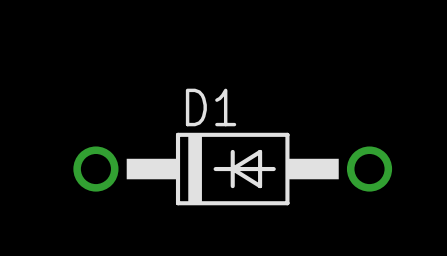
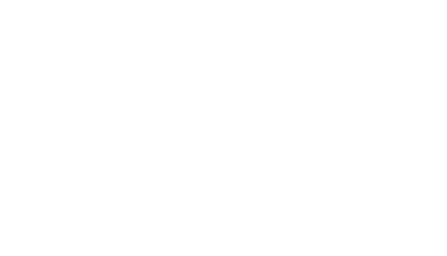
D1: (232, 169) -> none

